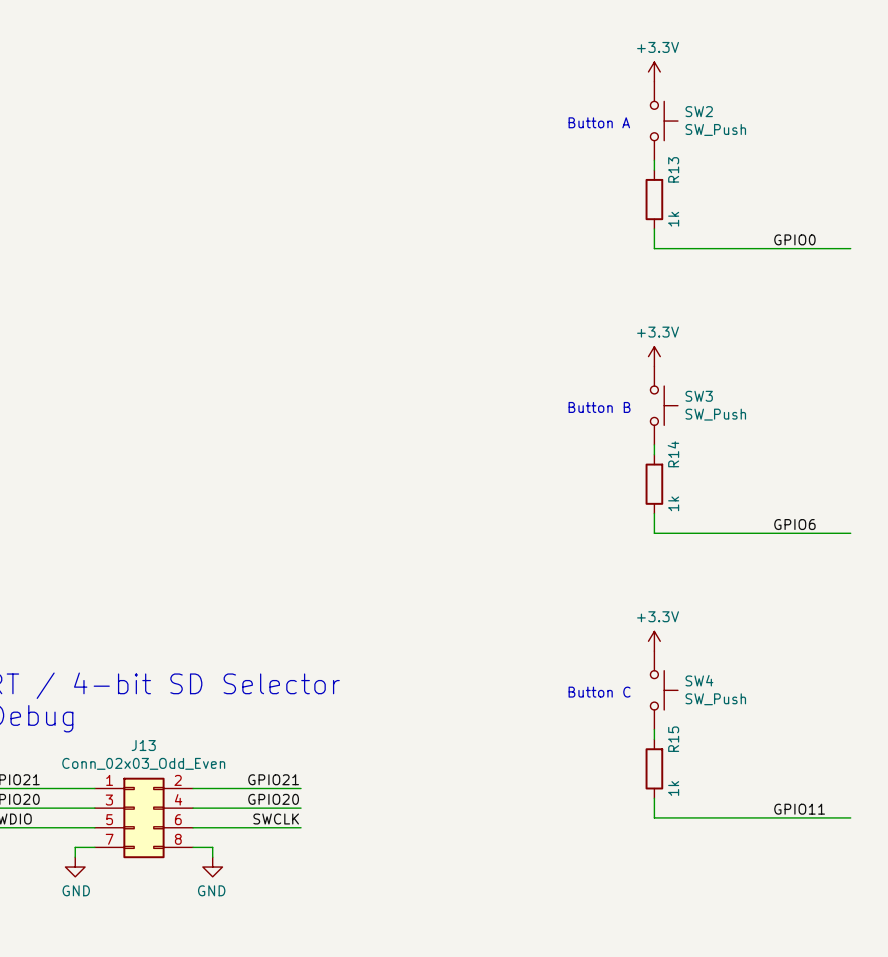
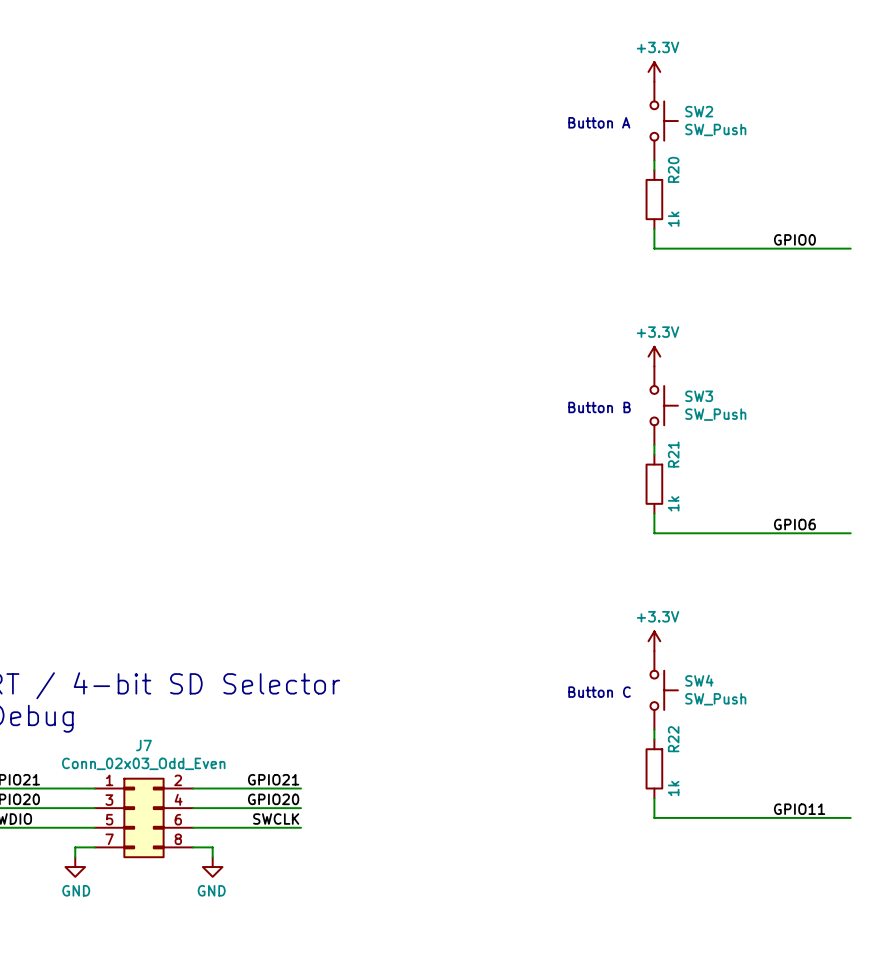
R13 name: R13 (673, 169) -> R20 (673, 169)
R14 name: R14 (673, 454) -> R21 (673, 454)
R15 name: R15 (673, 739) -> R22 (673, 739)
J13 name: J13 (143, 745) -> J7 (143, 745)

